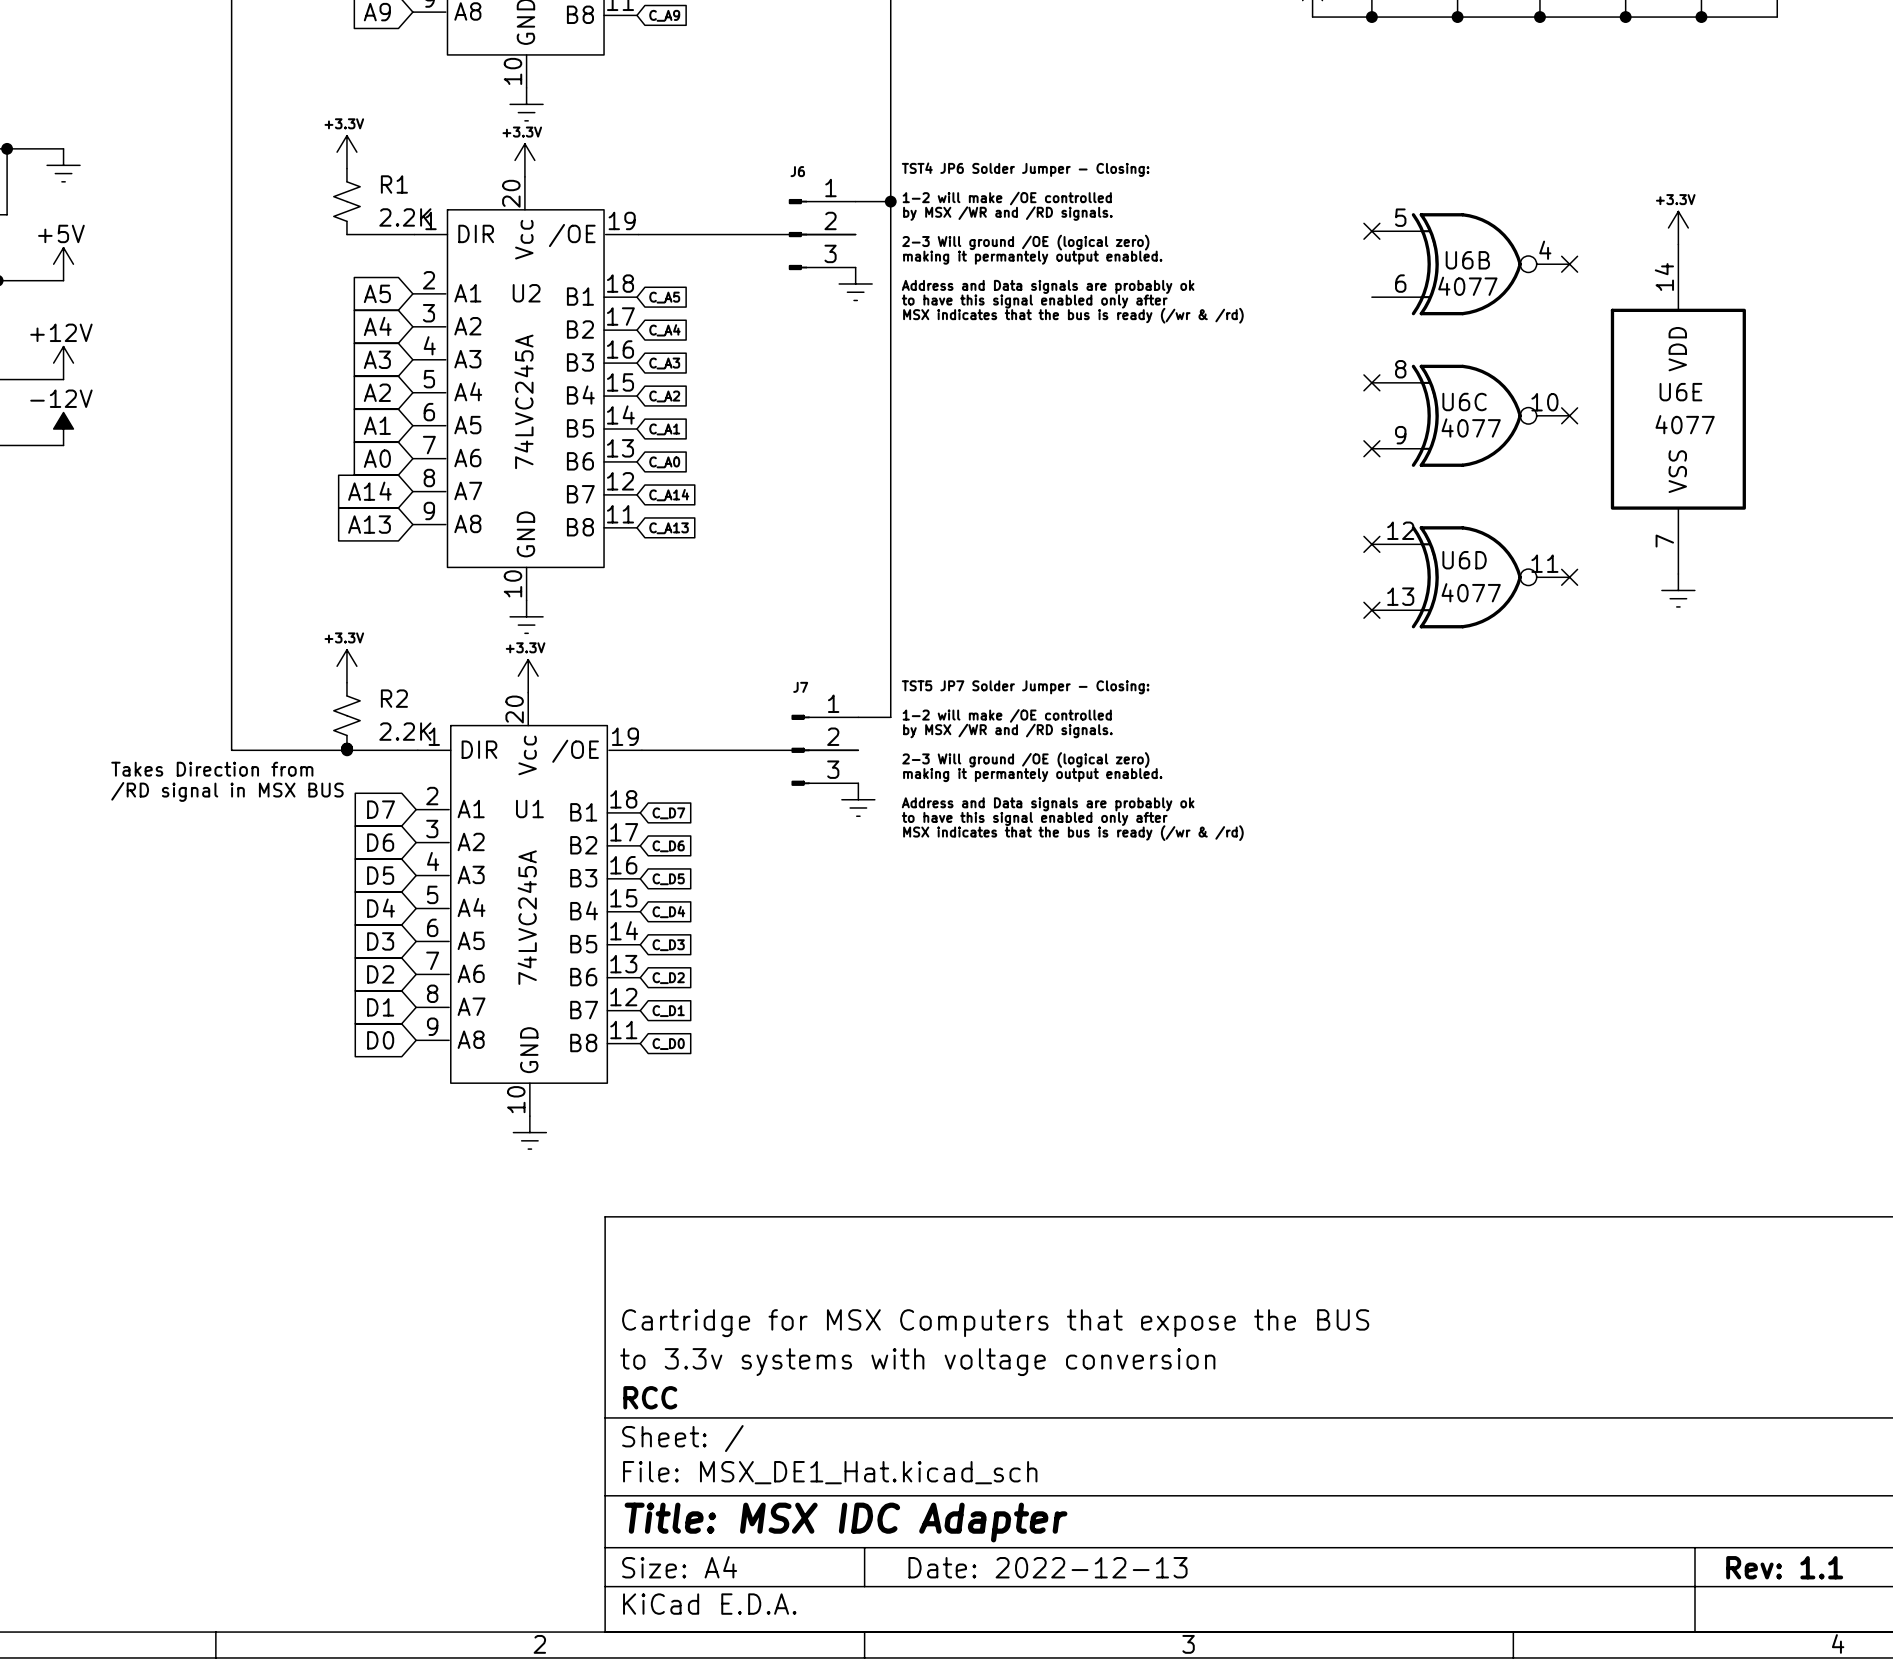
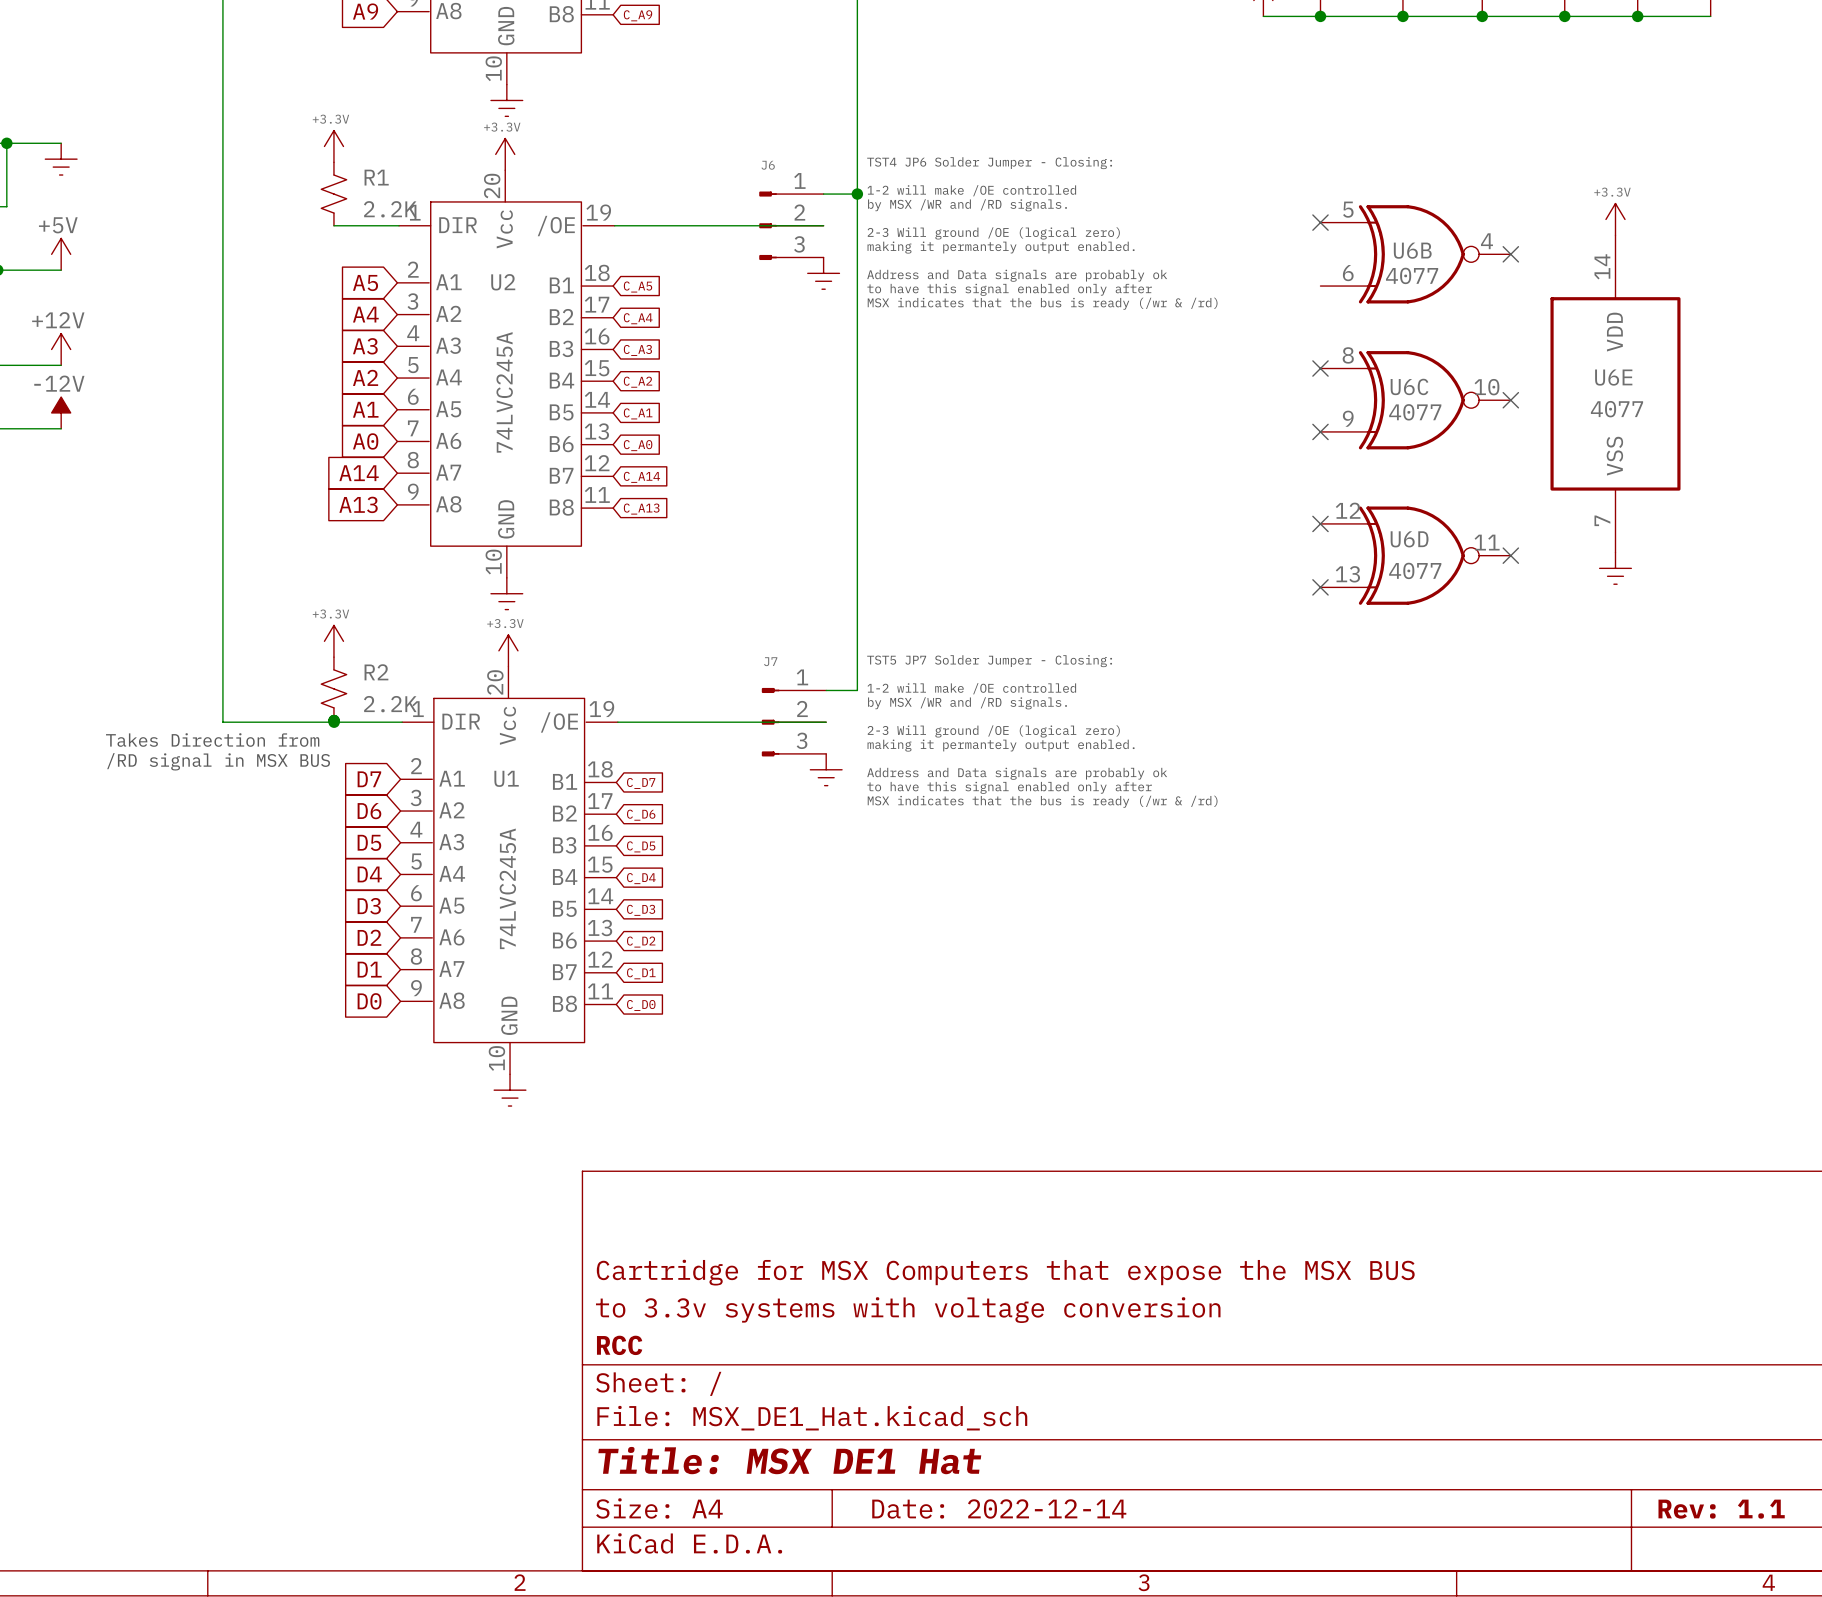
title block: Cartridge for MSX Computers that expose the BUS (995, 1323) -> Cartridge for MSX Computers that expose the MSX BUS (1005, 1272)
title block: Title: MSX IDC Adapter (846, 1522) -> Title: MSX DE1 Hat (789, 1460)
title block: Date: 2022-12-13 (1048, 1567) -> Date: 2022-12-14 (999, 1508)

